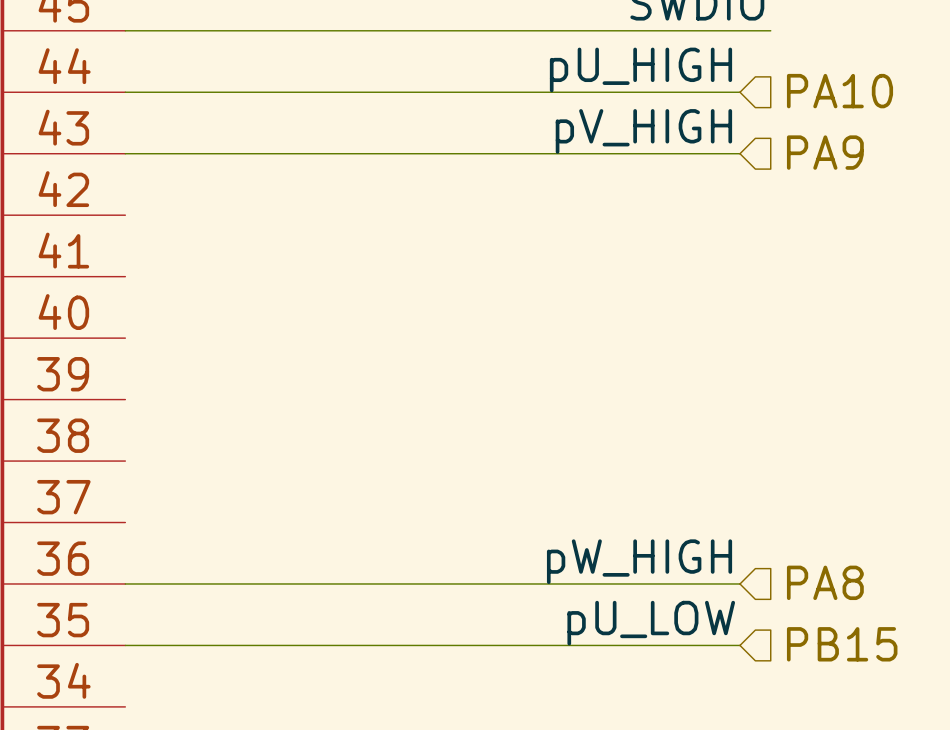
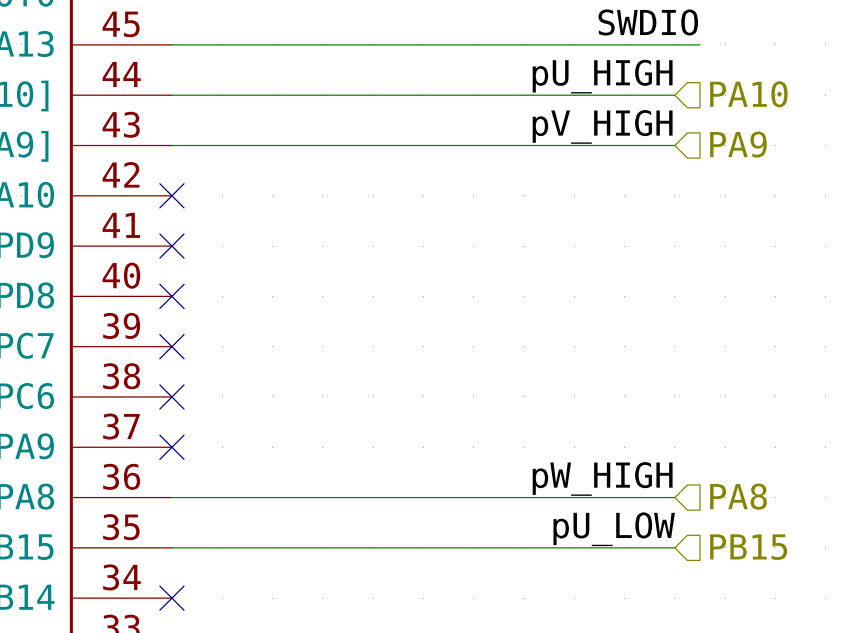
no-connect mark: none -> (171, 195)
no-connect mark: none -> (171, 246)
no-connect mark: none -> (171, 296)
no-connect mark: none -> (171, 346)
no-connect mark: none -> (171, 396)
no-connect mark: none -> (171, 447)
no-connect mark: none -> (171, 598)

